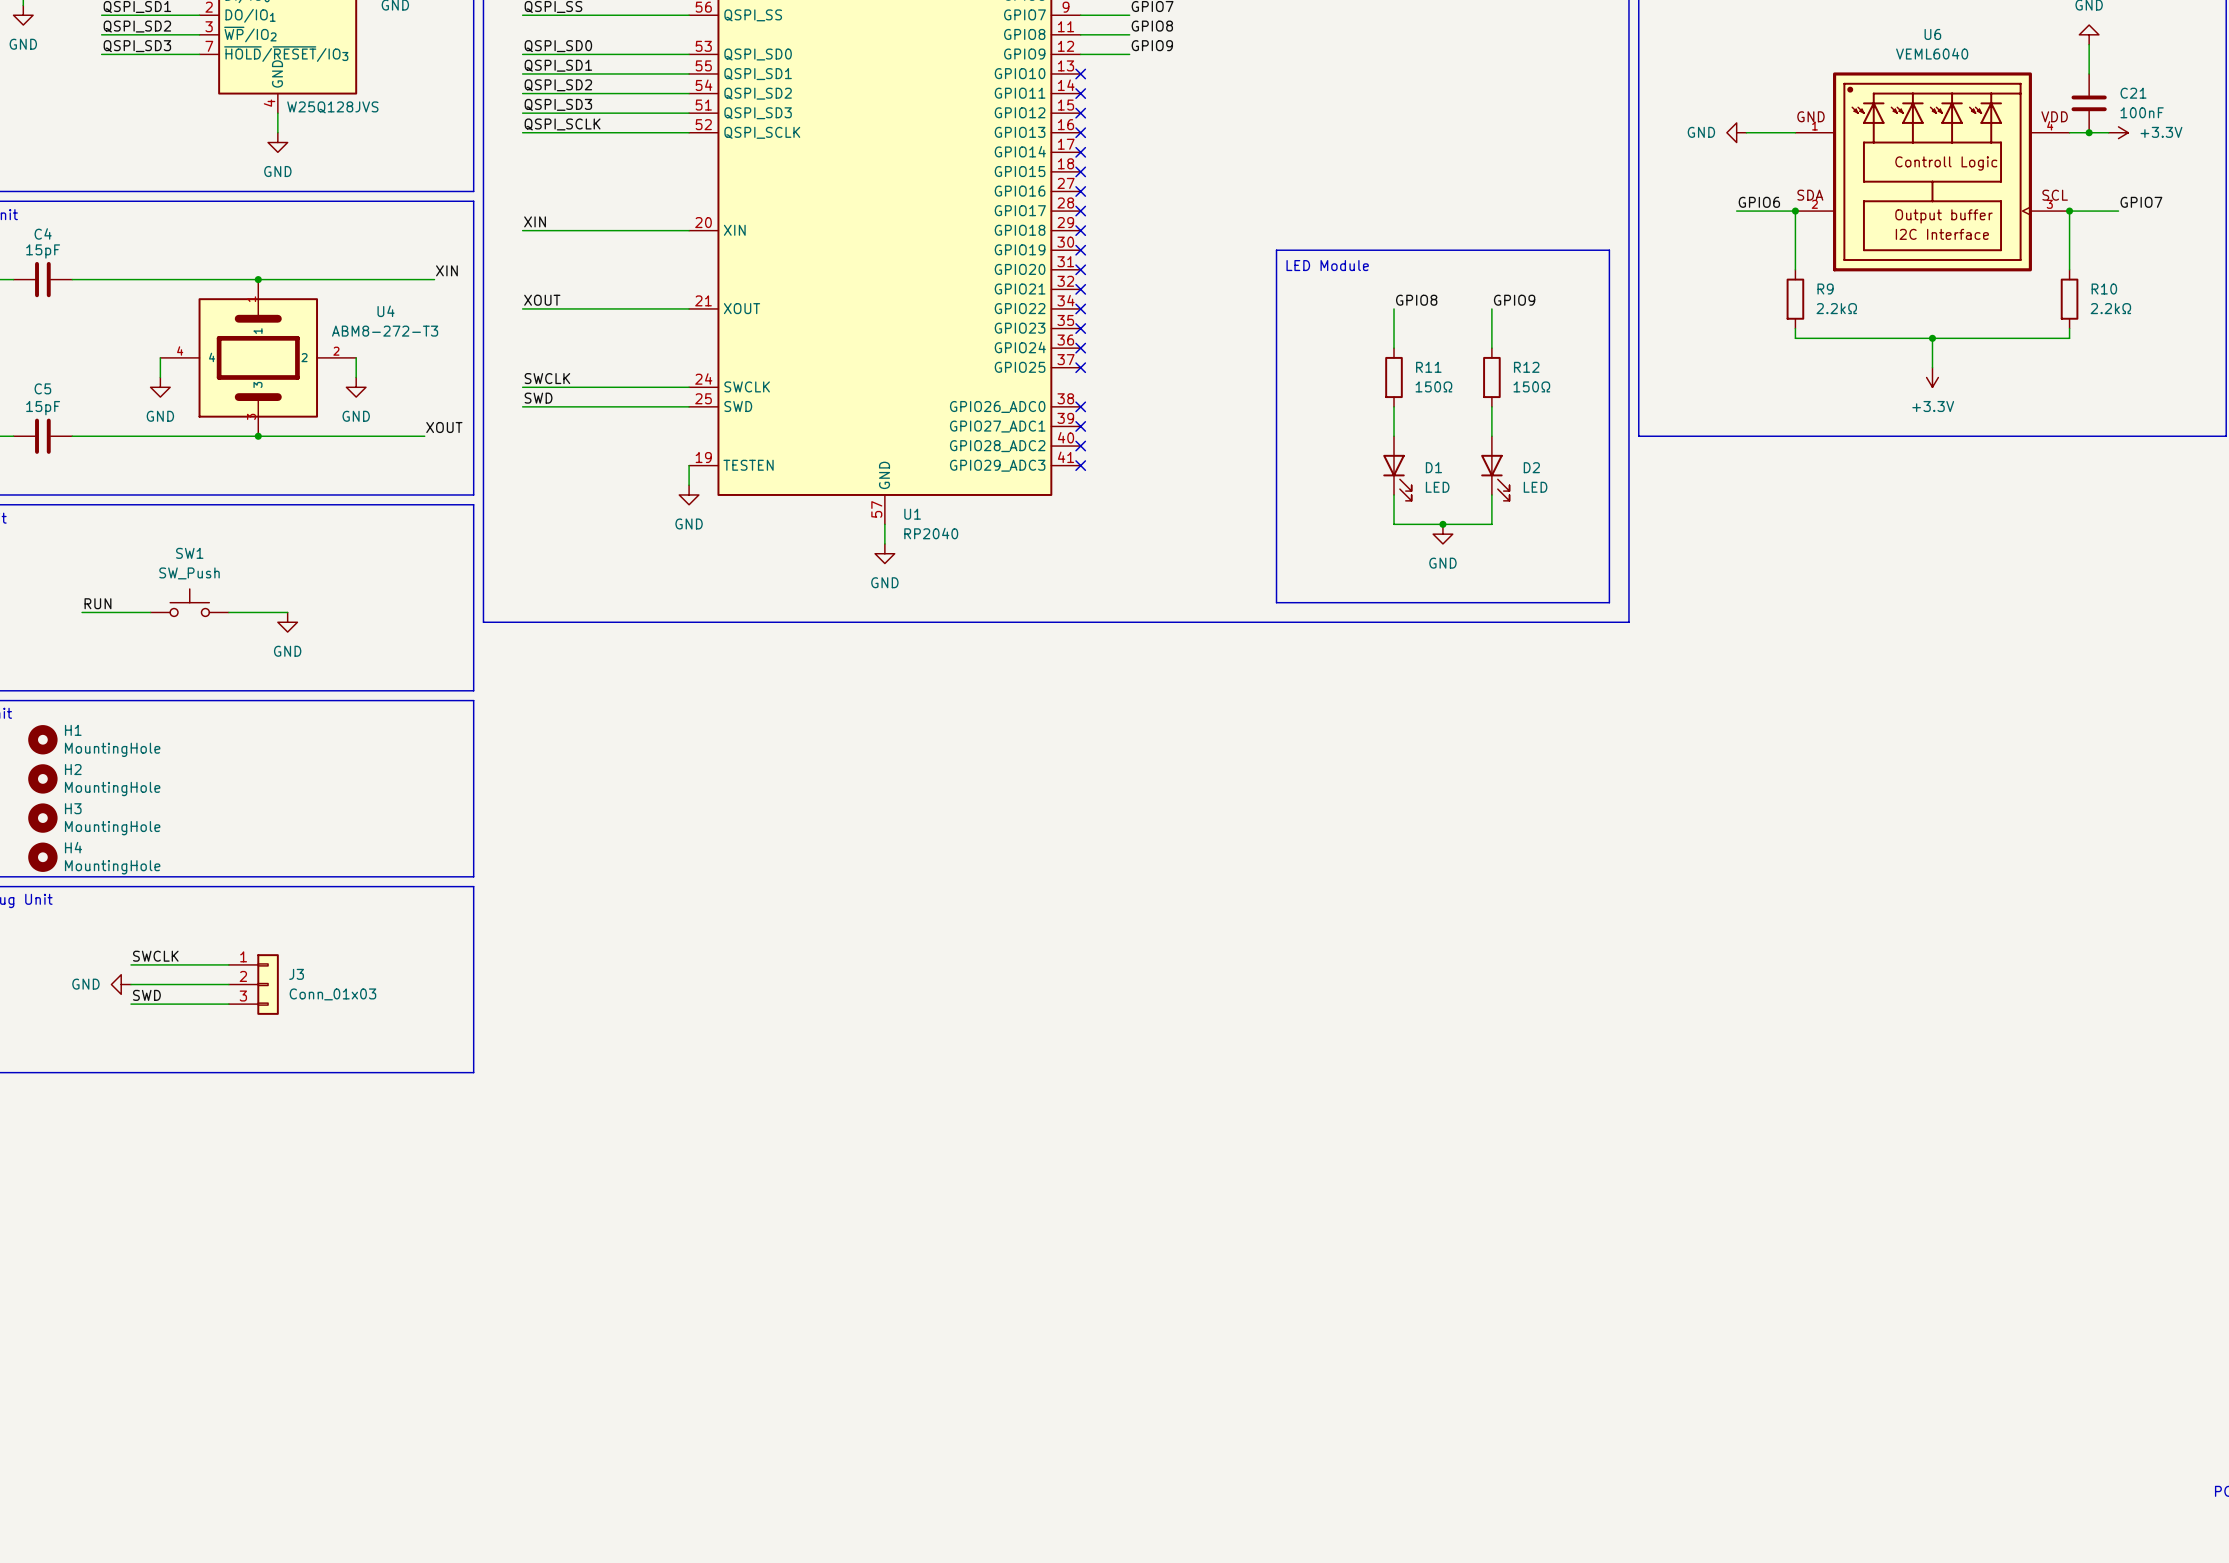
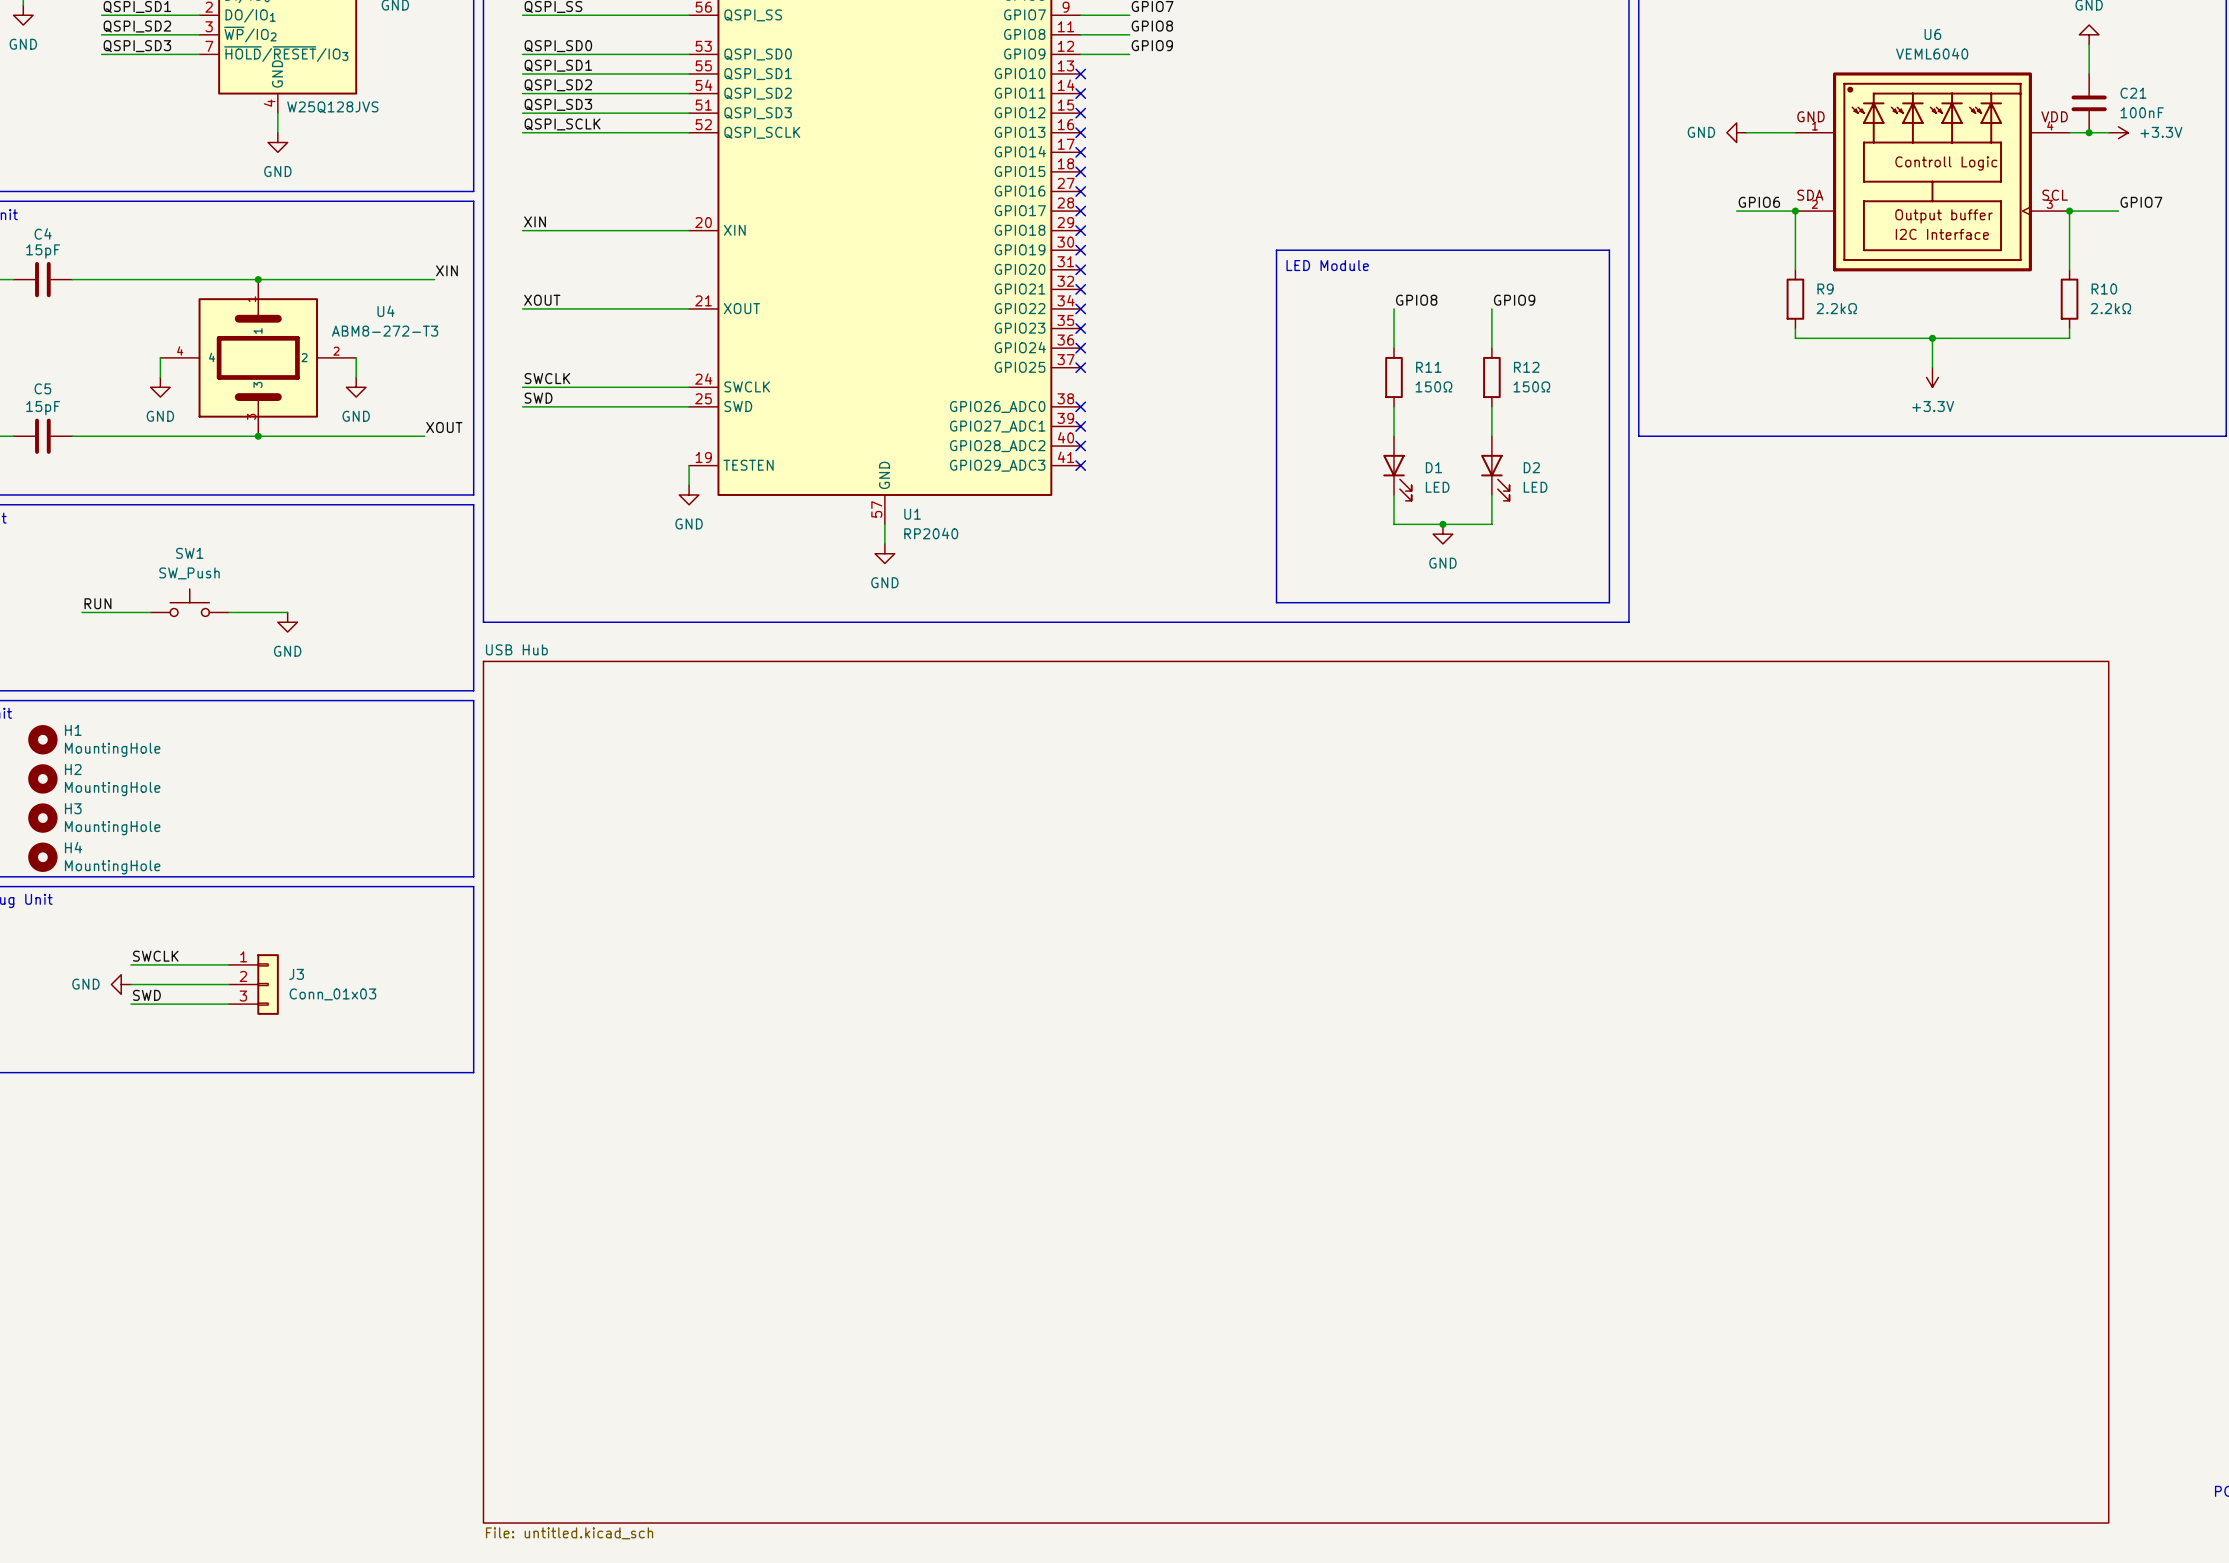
sheet USB Hub: none -> File: untitled.kicad_sch (1296, 1092)

